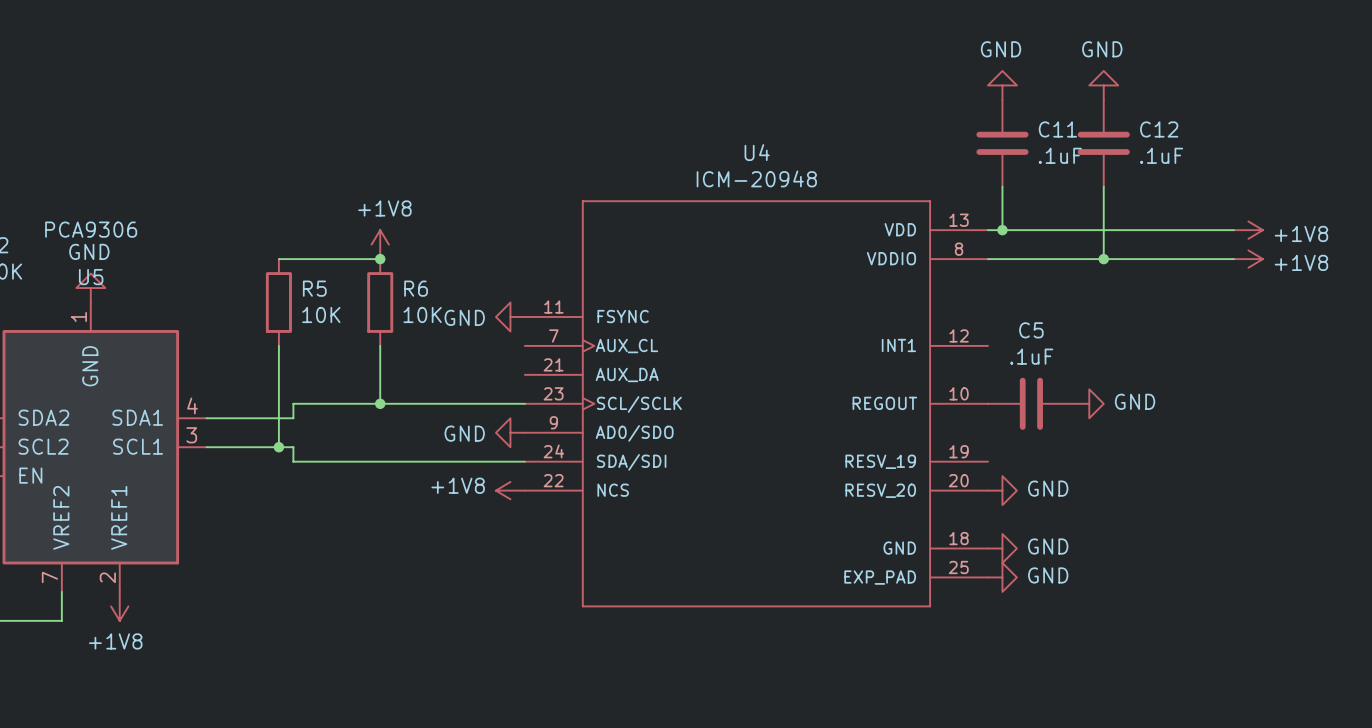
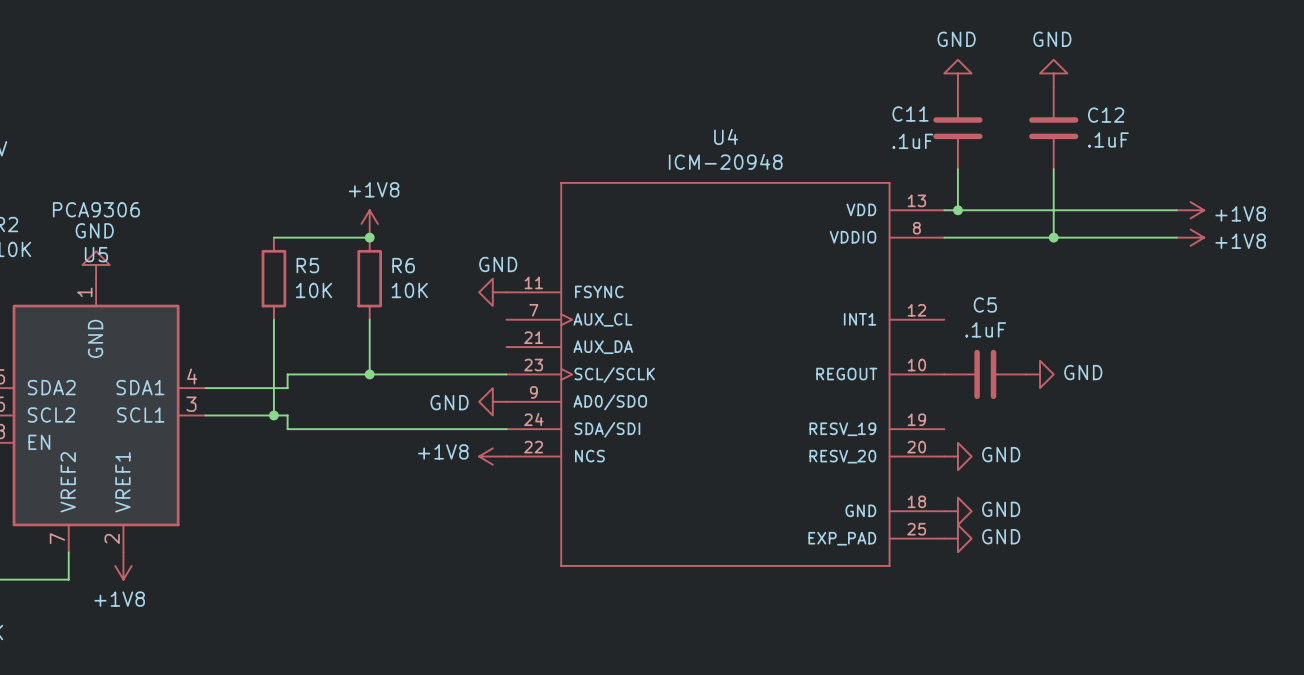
C11 name position: C11 (1057, 129) -> C11 (910, 114)
C11 value position: .1uF (1060, 155) -> .1uF (912, 141)
power symbol text position: GND (464, 317) -> GND (498, 264)

